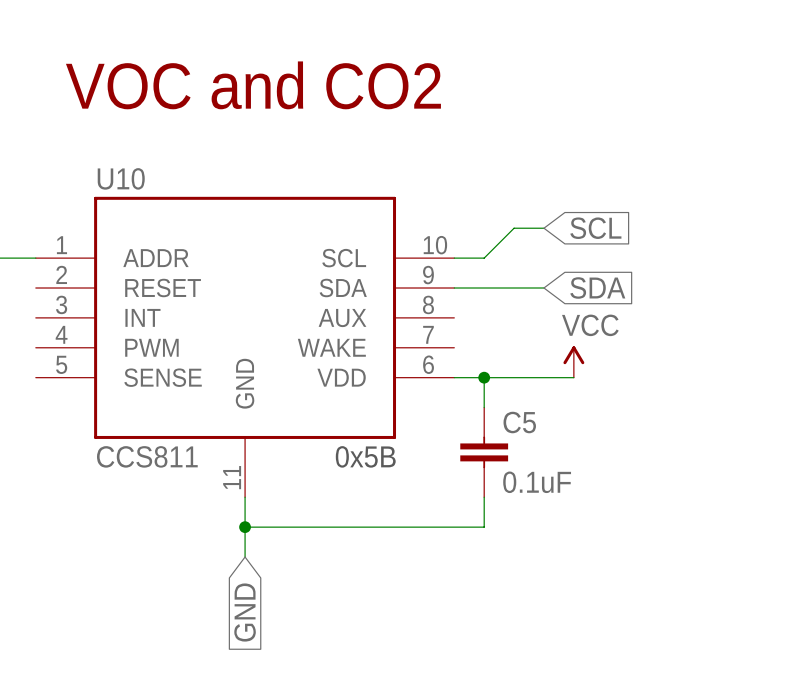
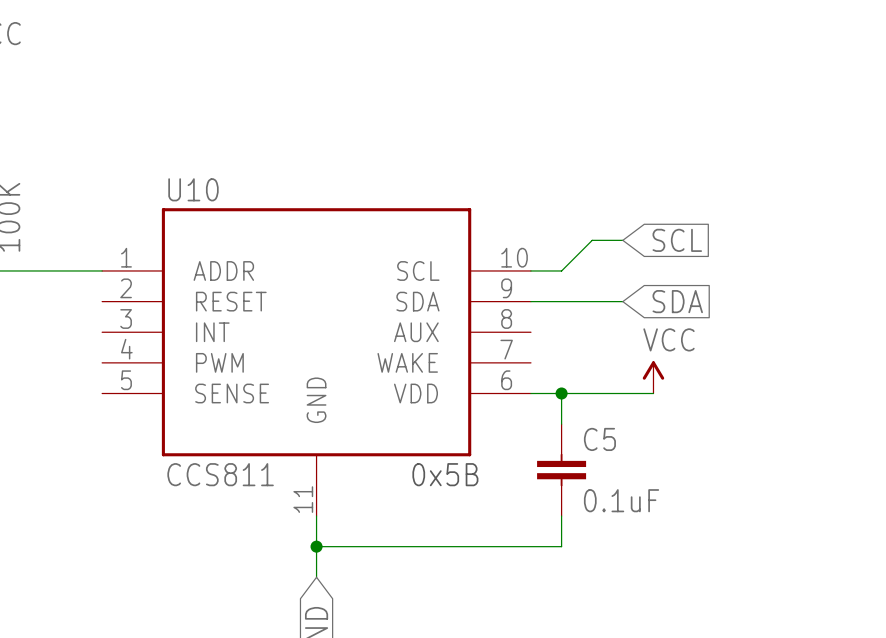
text: VOC and CO2 (253, 85) -> none

